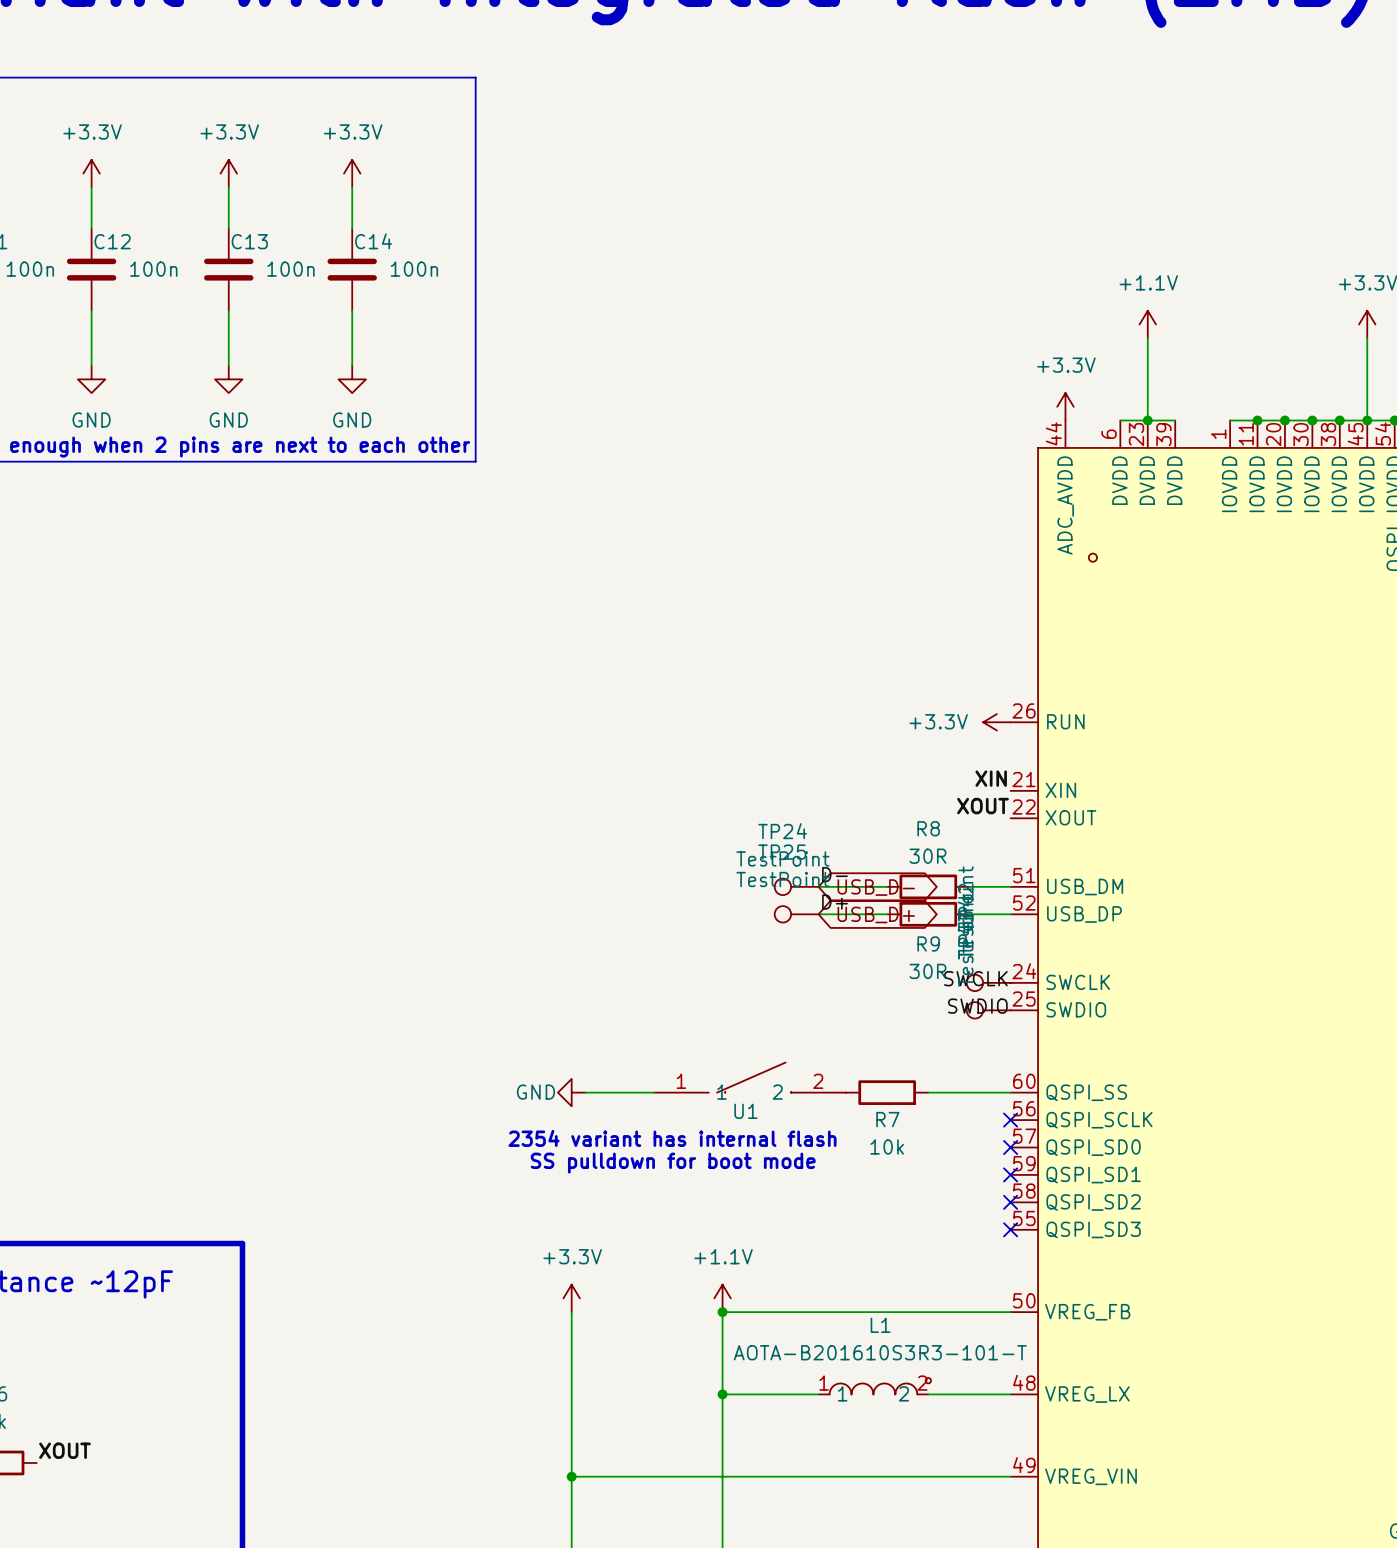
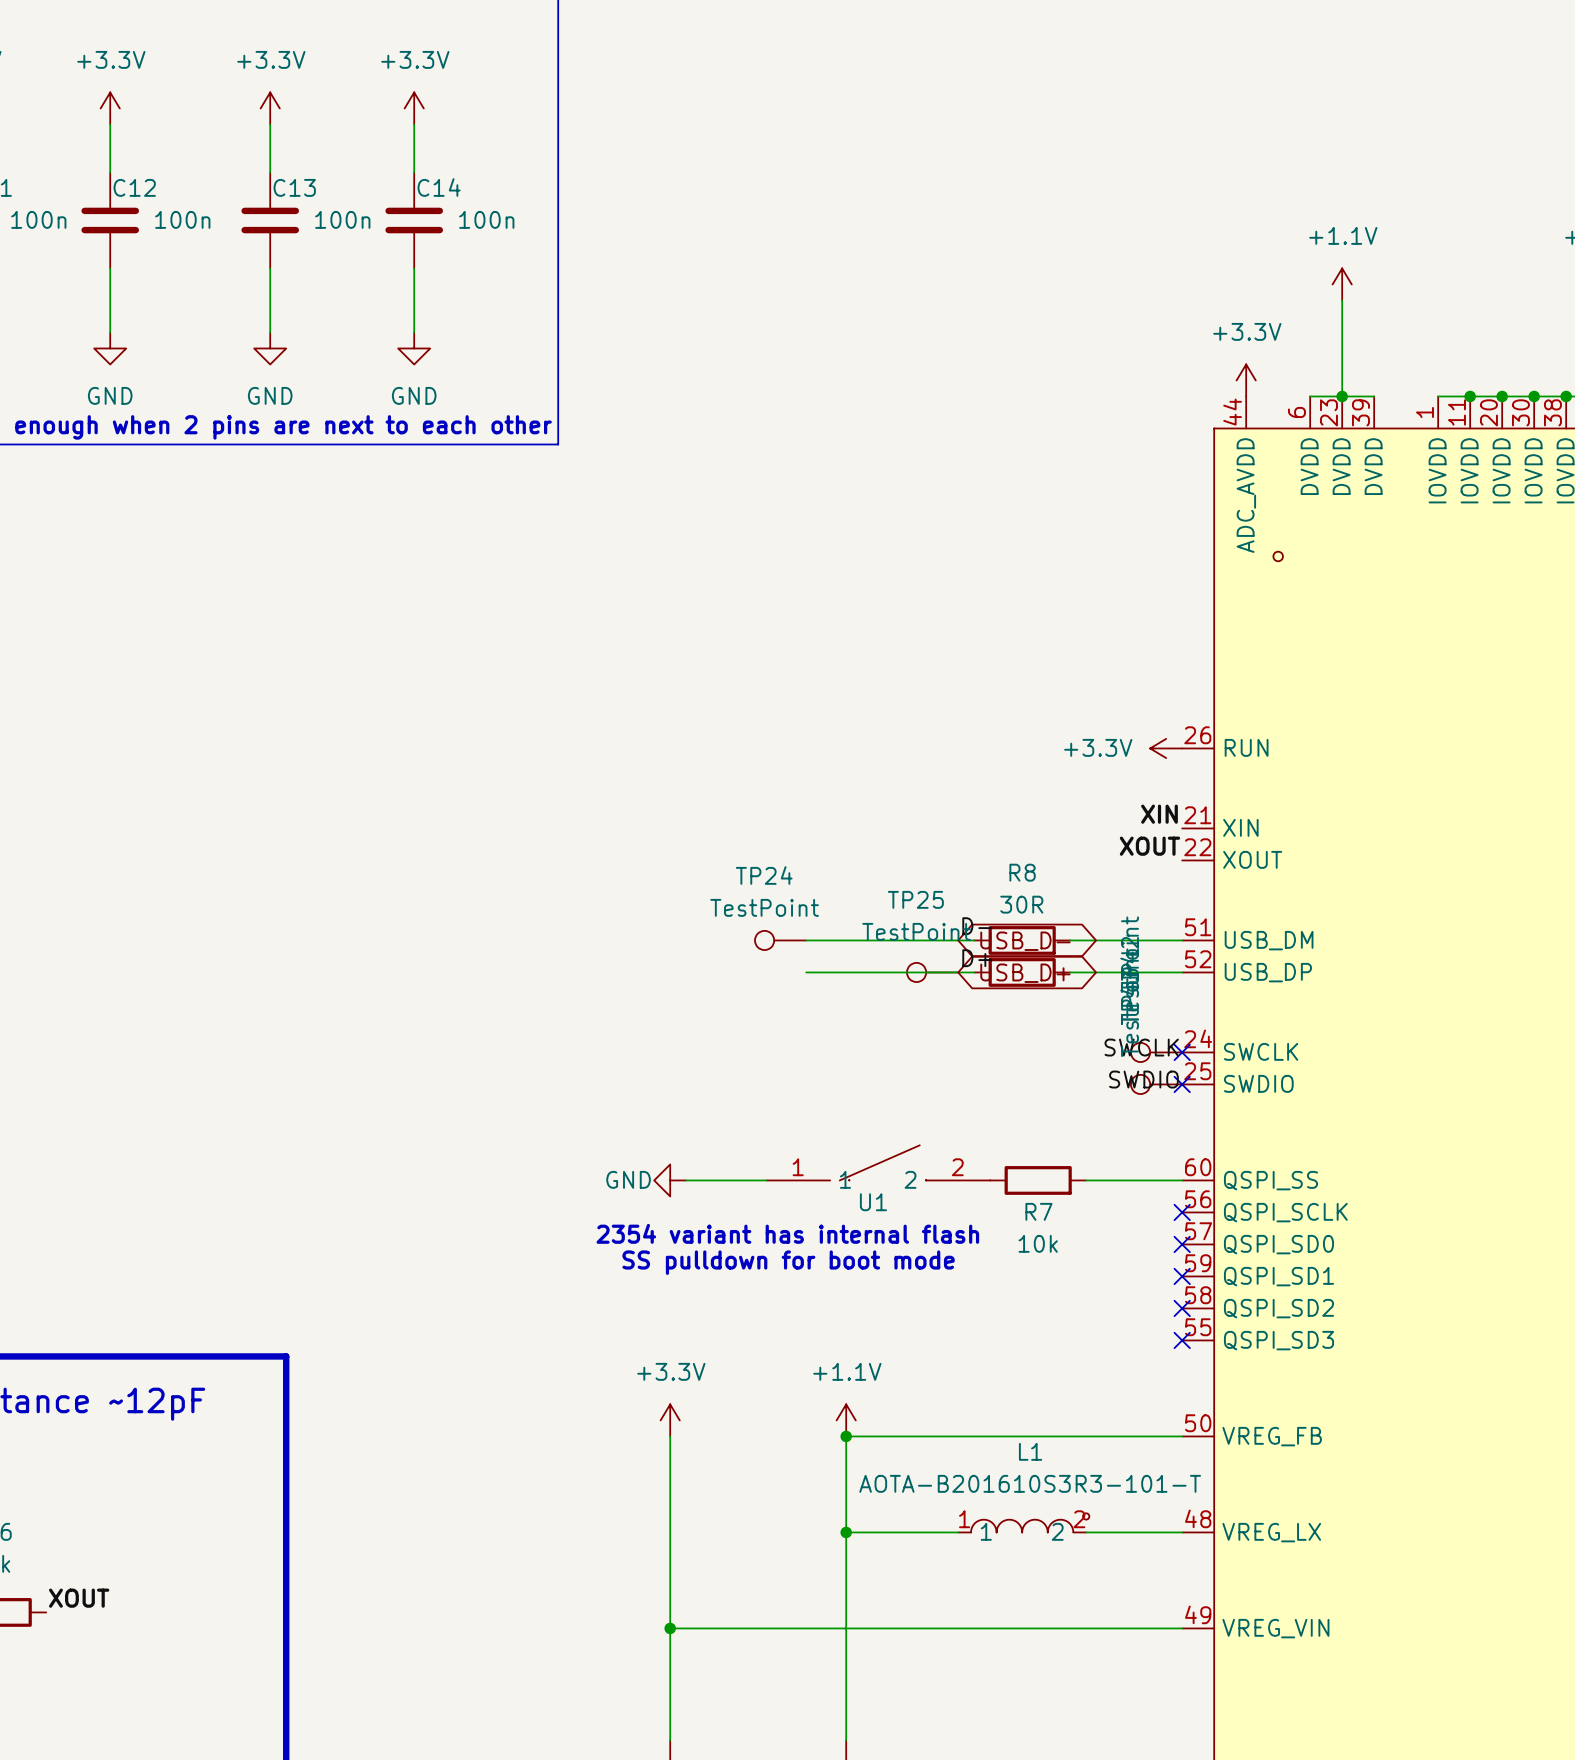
wire: none -> (806, 940) (958, 940)
TP24 position: (796, 886) -> (780, 940)
wire: (832, 886) (887, 886) -> (1070, 940) (1134, 940)
R8 position: (928, 886) -> (1022, 940)
wire: none -> (806, 972) (958, 972)
wire: (832, 914) (887, 914) -> (1070, 972) (1134, 972)
part: none -> (1022, 972)
R9: 30R (928, 914) -> none
no-connect mark: none -> (1182, 1052)
no-connect mark: none -> (1182, 1084)

